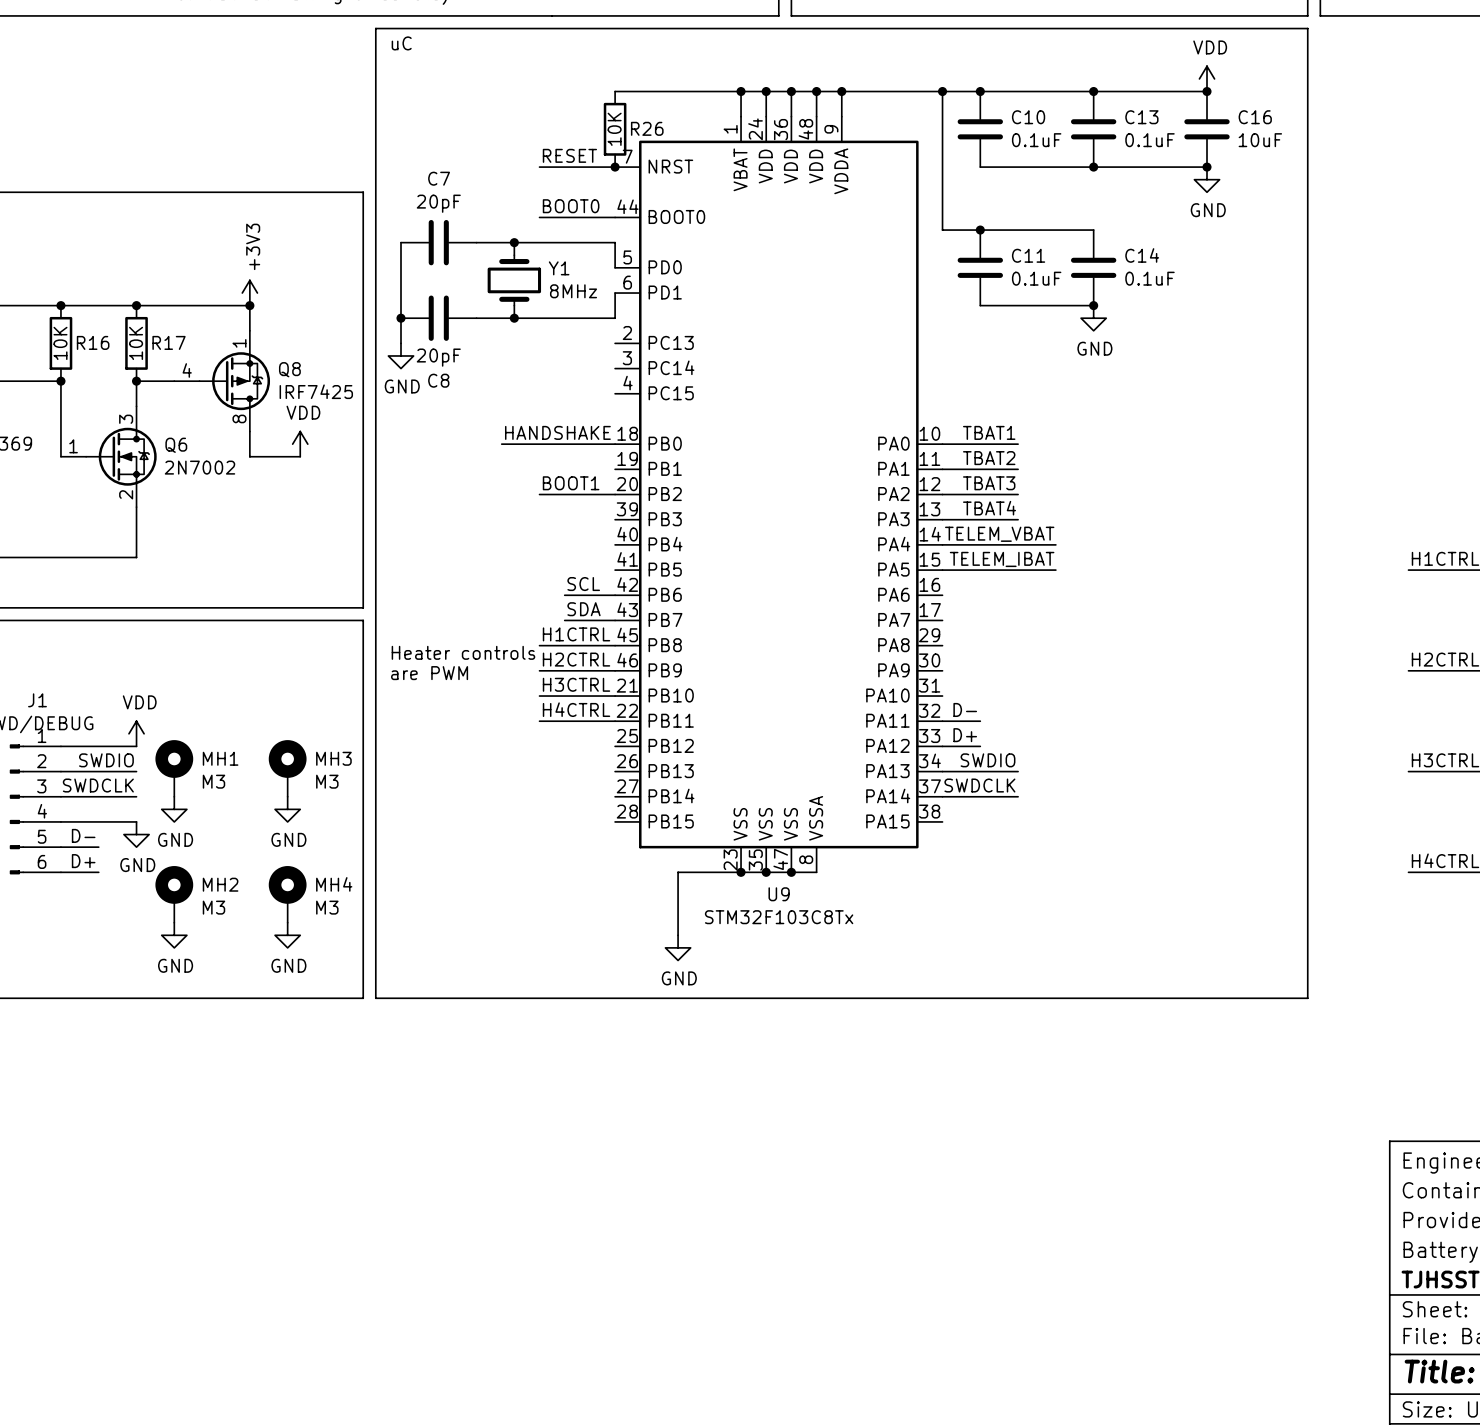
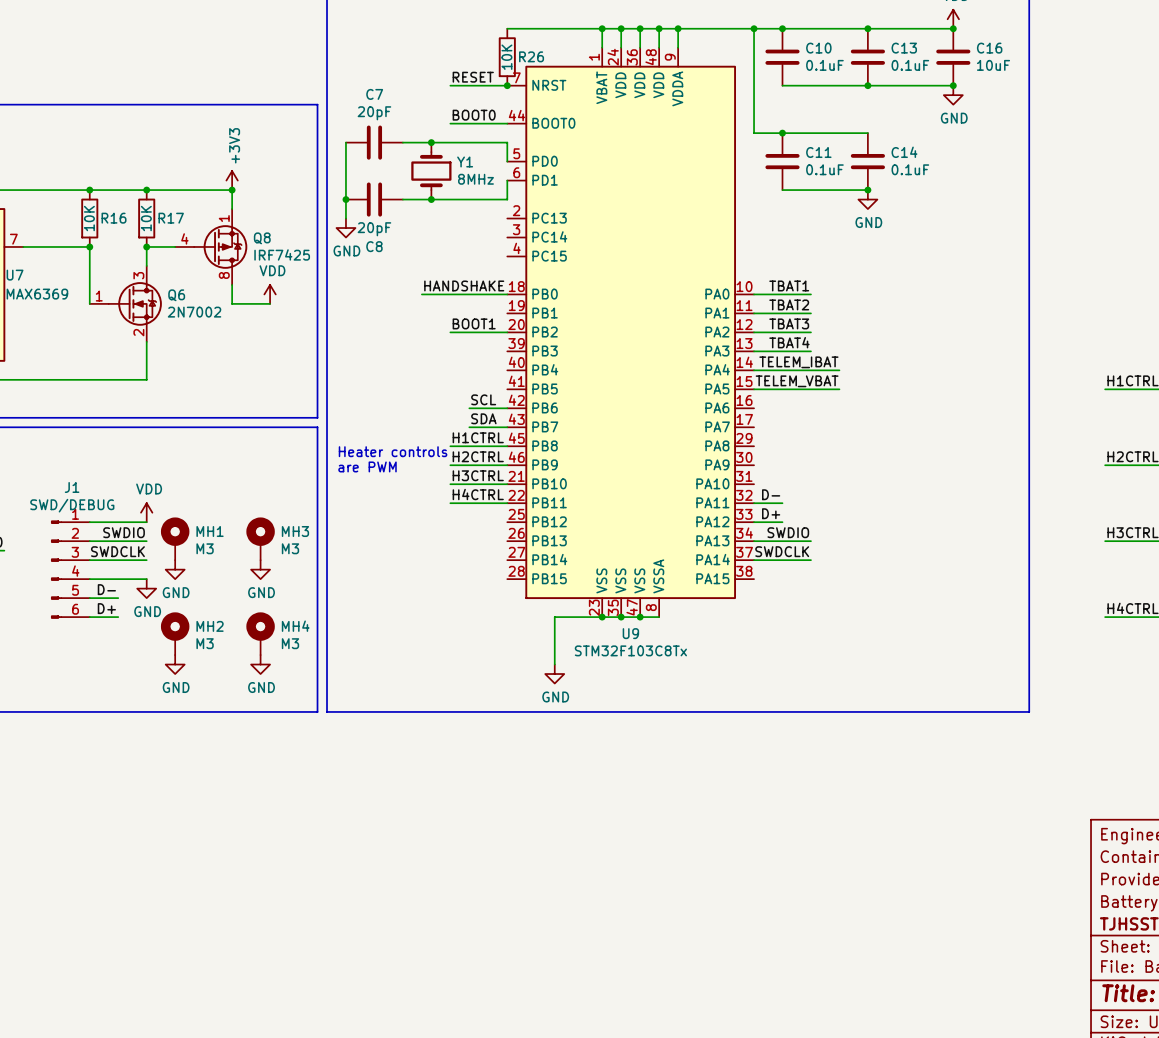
label: TELEM_VBAT (999, 534) -> TELEM_IBAT (798, 362)
label: TELEM_IBAT (1002, 559) -> TELEM_VBAT (797, 381)

